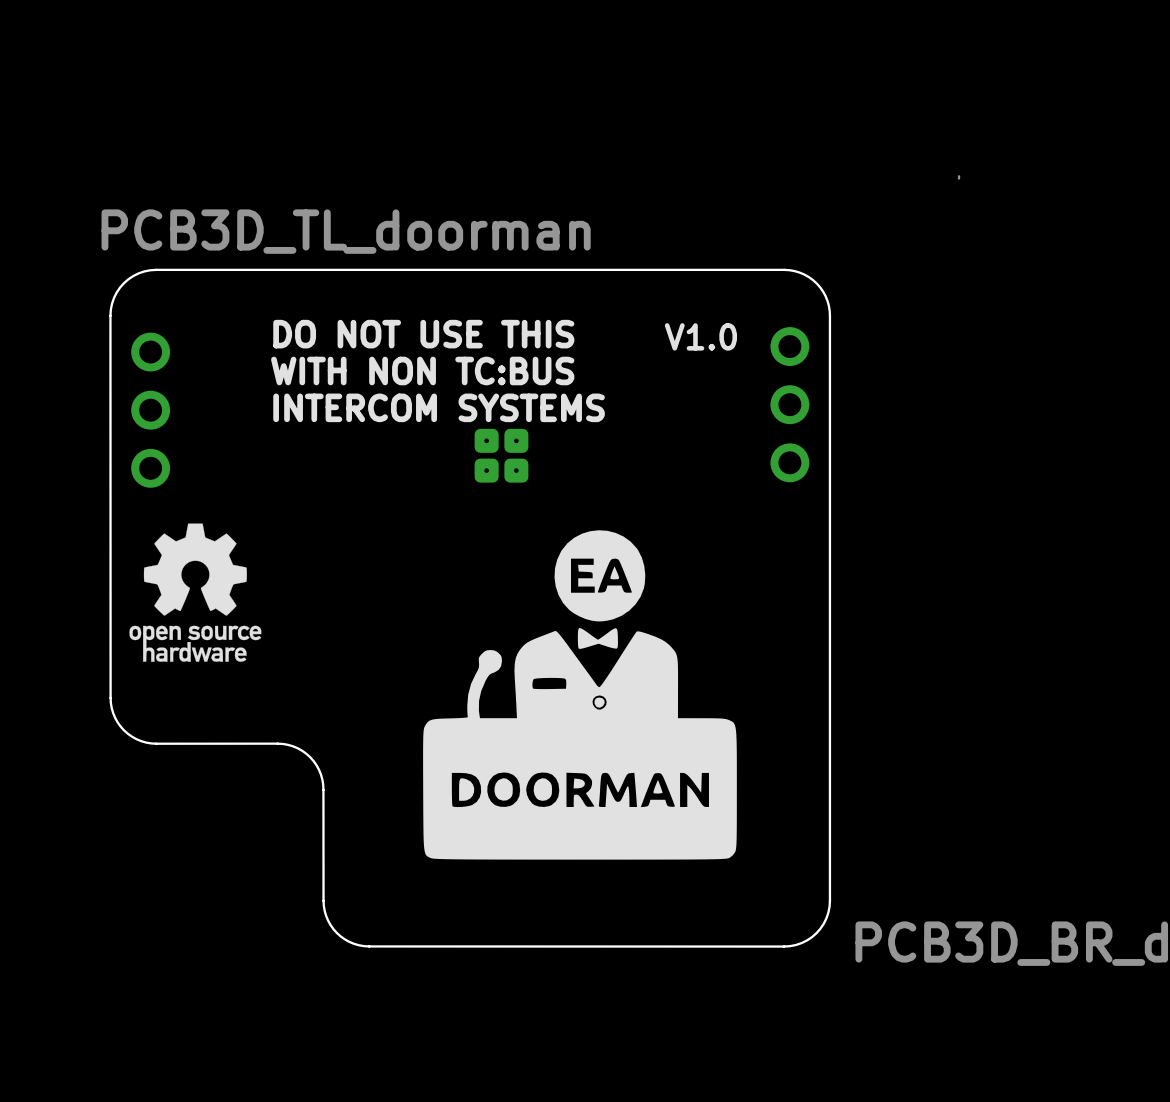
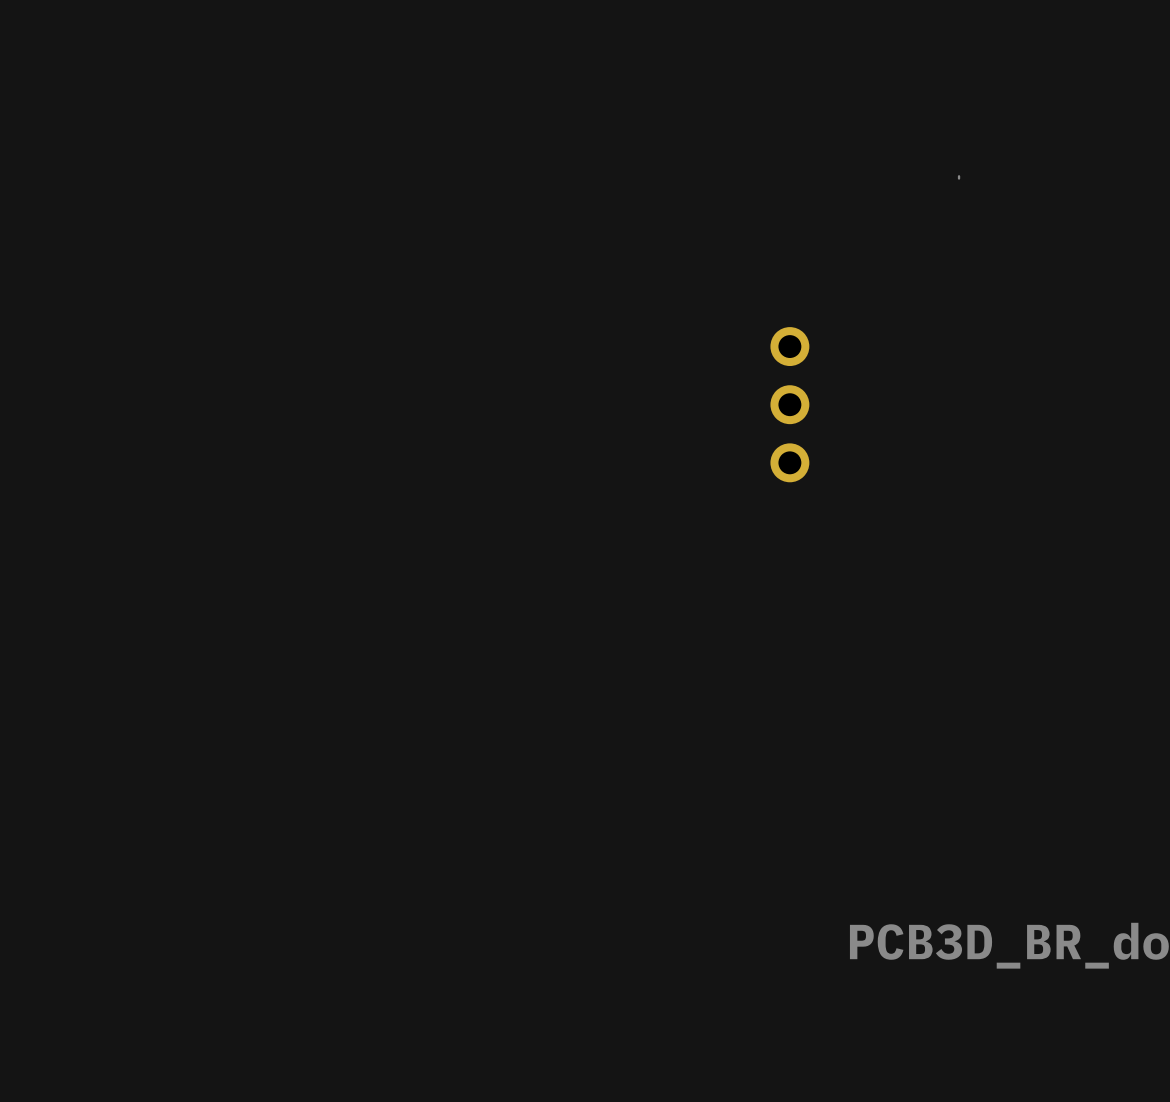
text: PCB3D_TL_doorman (346, 231) -> none
board edge: (156, 269) (784, 269) (804, 274) (816, 283) (825, 296) (829, 316) (829, 900) (826, 918) (816, 933) (801, 943) (784, 946) (369, 946) (354, 943) (344, 939) (333, 929) (324, 910) (323, 784) (319, 769) (310, 757) (297, 748) (282, 743) (151, 743) (136, 739) (123, 730) (115, 717) (110, 697) (110, 309) (116, 292) (123, 283) (138, 273) (156, 269) -> none
text: DO NOT USE THIS (423, 334) -> none
text: V1.0 (700, 336) -> none
text: WITH NON TC:BUS (422, 370) -> none
text: INTERCOM SYSTEMS (439, 407) -> none
part: (150, 410) -> none
part: (501, 455) -> none
drawing: [129, 523, 262, 662] -> none
drawing: [423, 530, 737, 860] -> none

